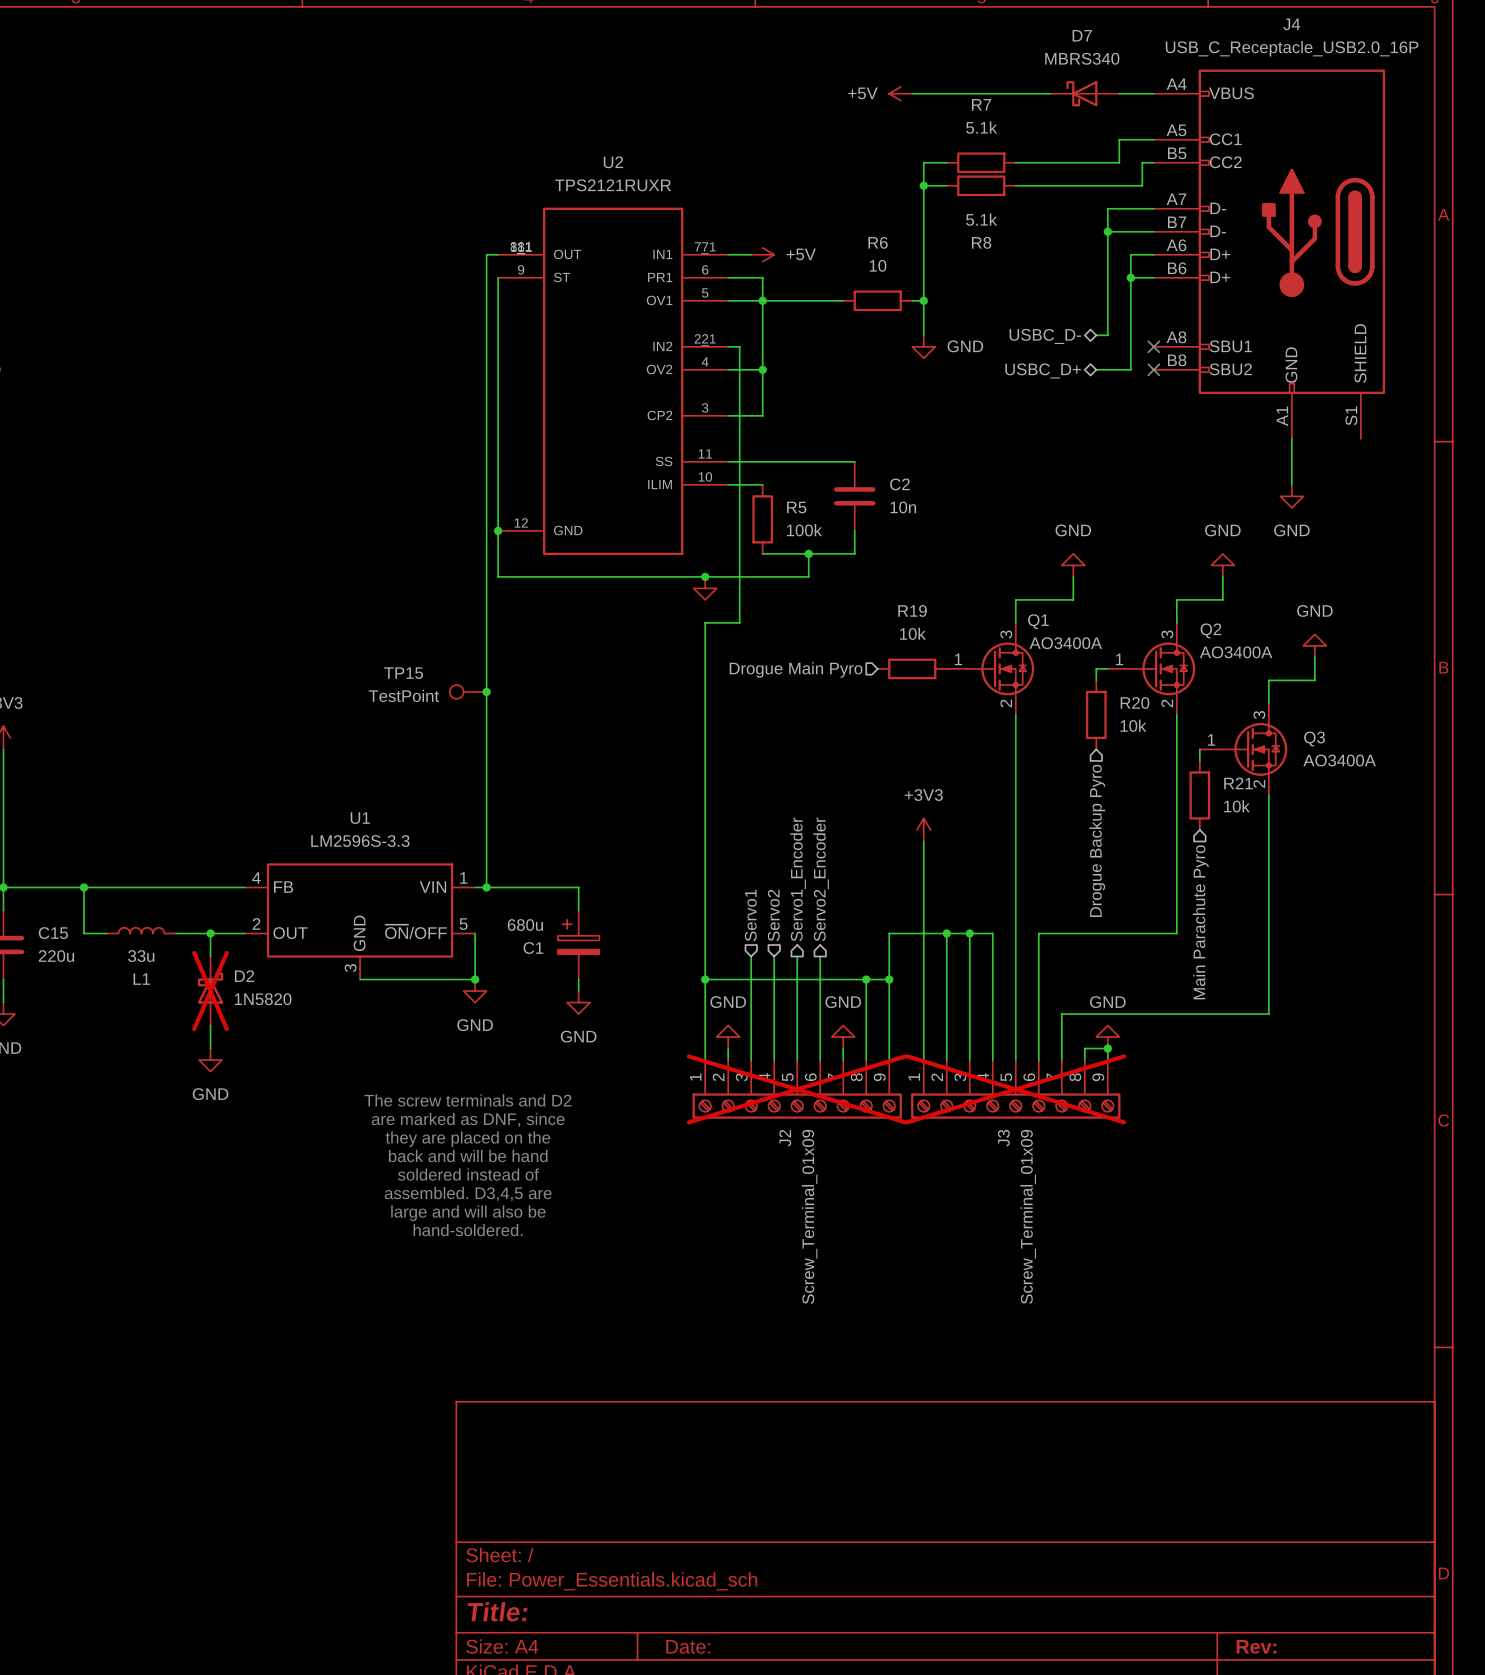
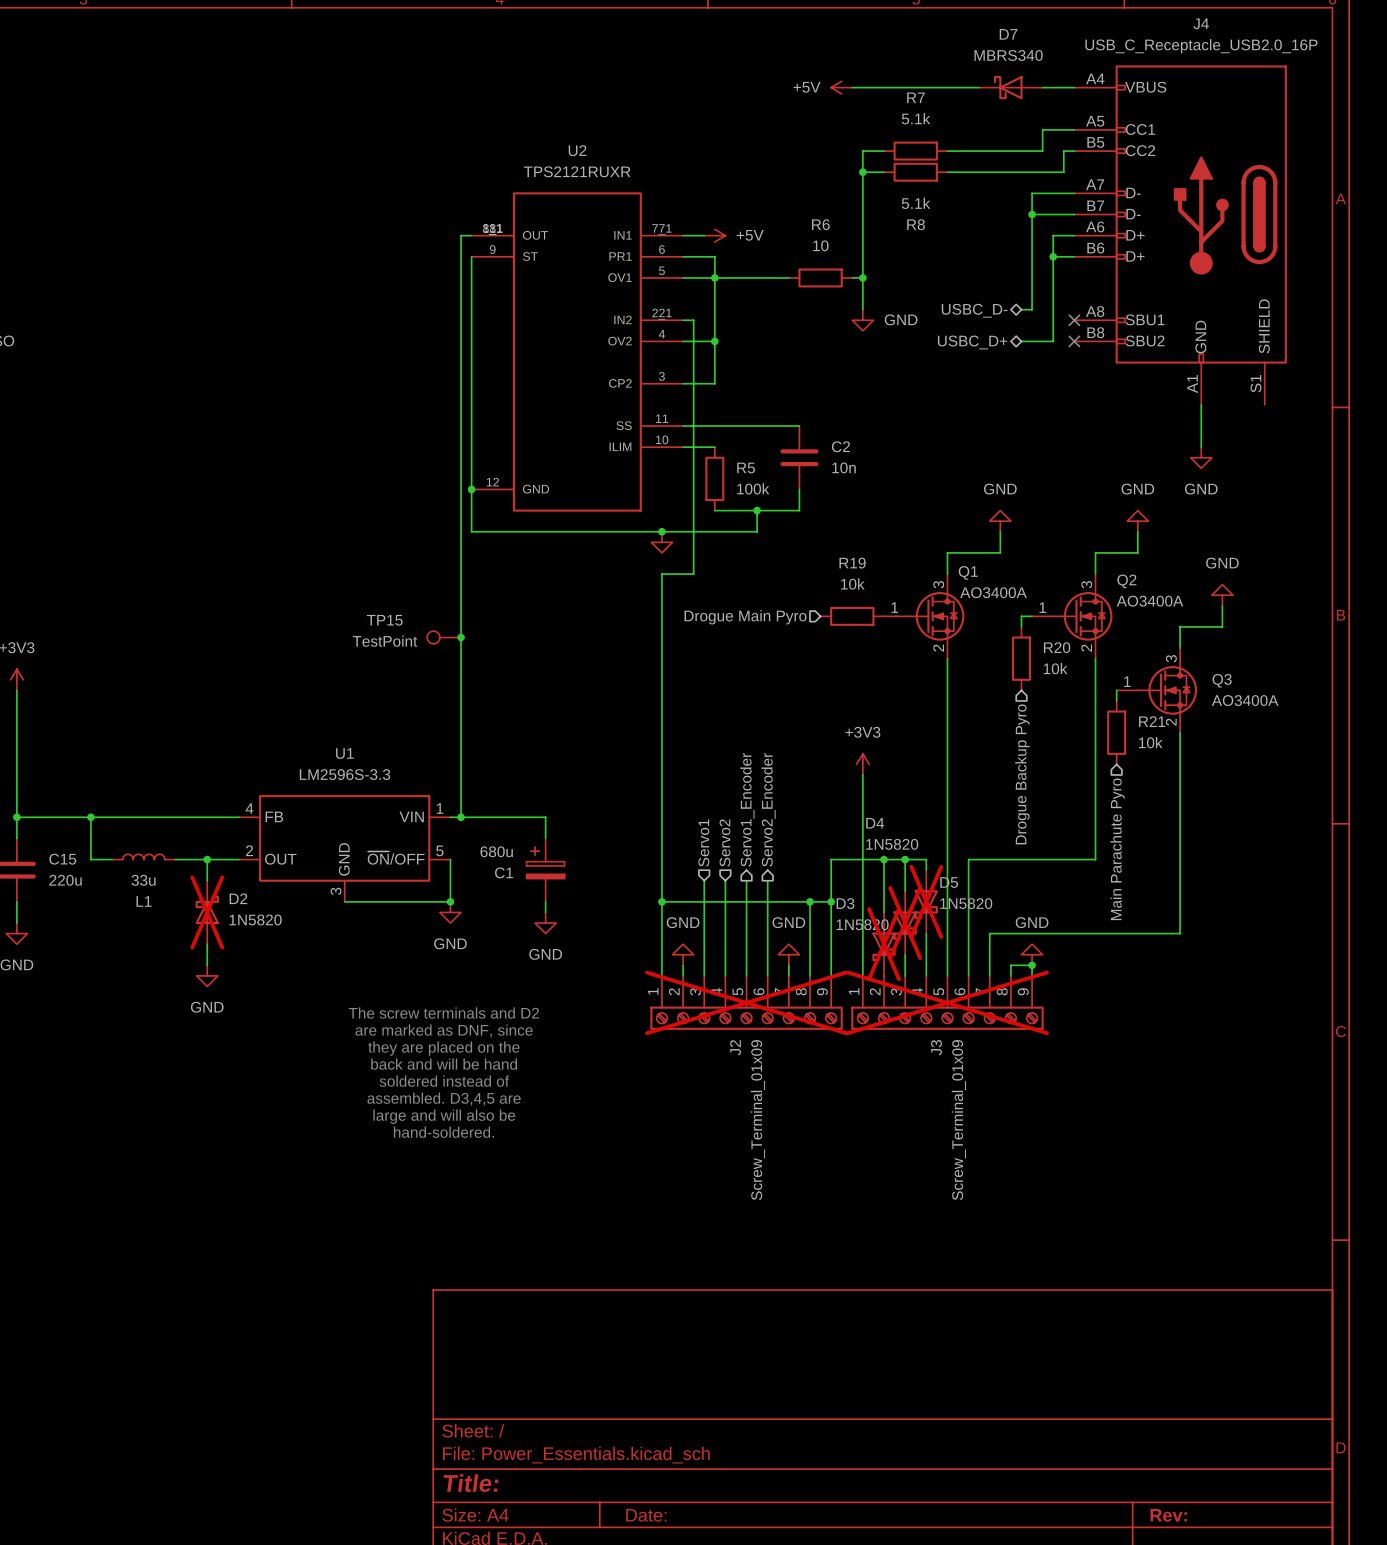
D5: none -> 1N5820 (926, 901)
D4: none -> 1N5820 (905, 923)
D3: none -> 1N5820 (884, 944)

